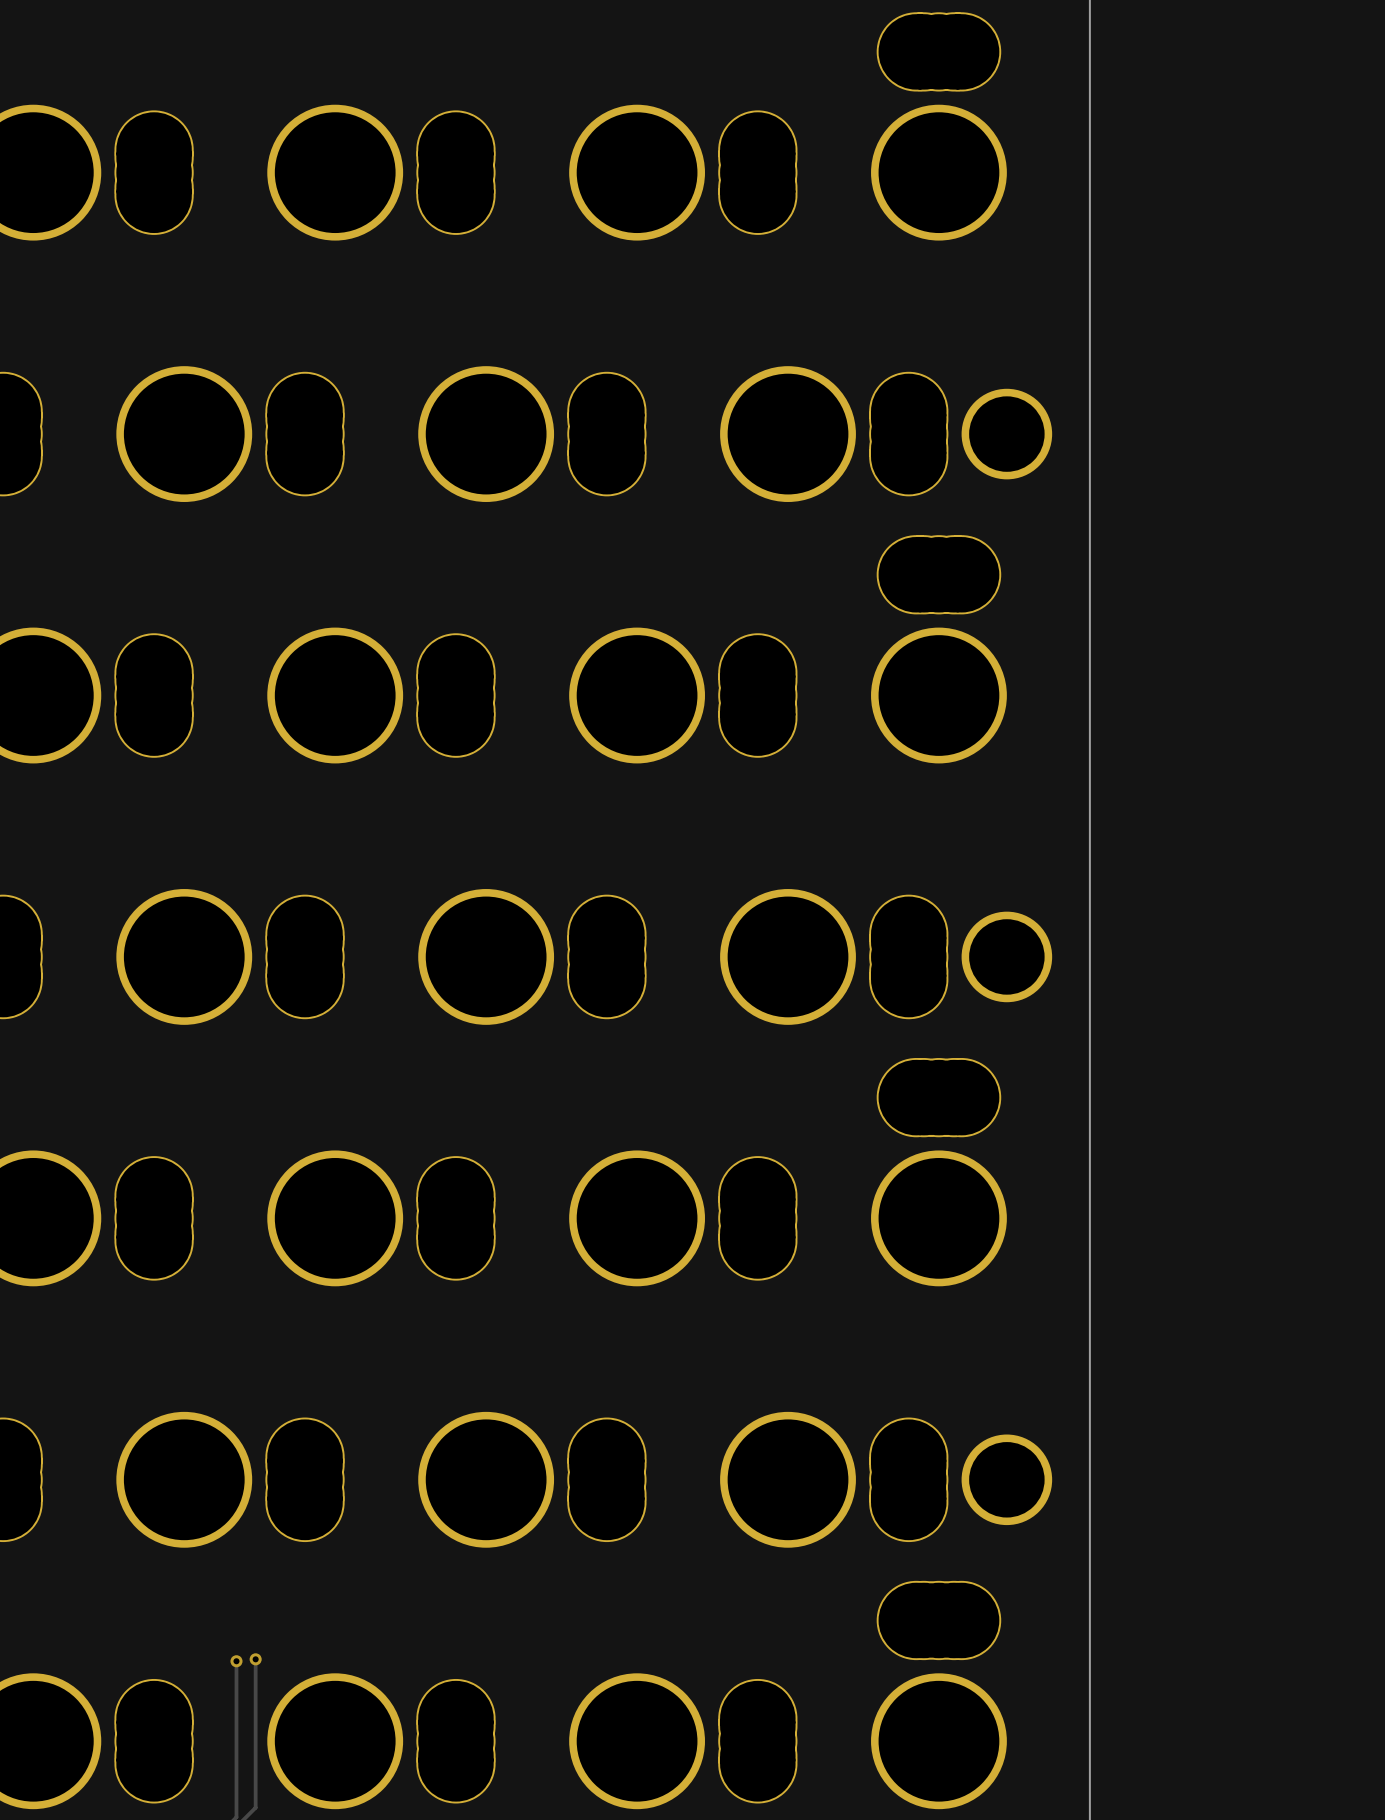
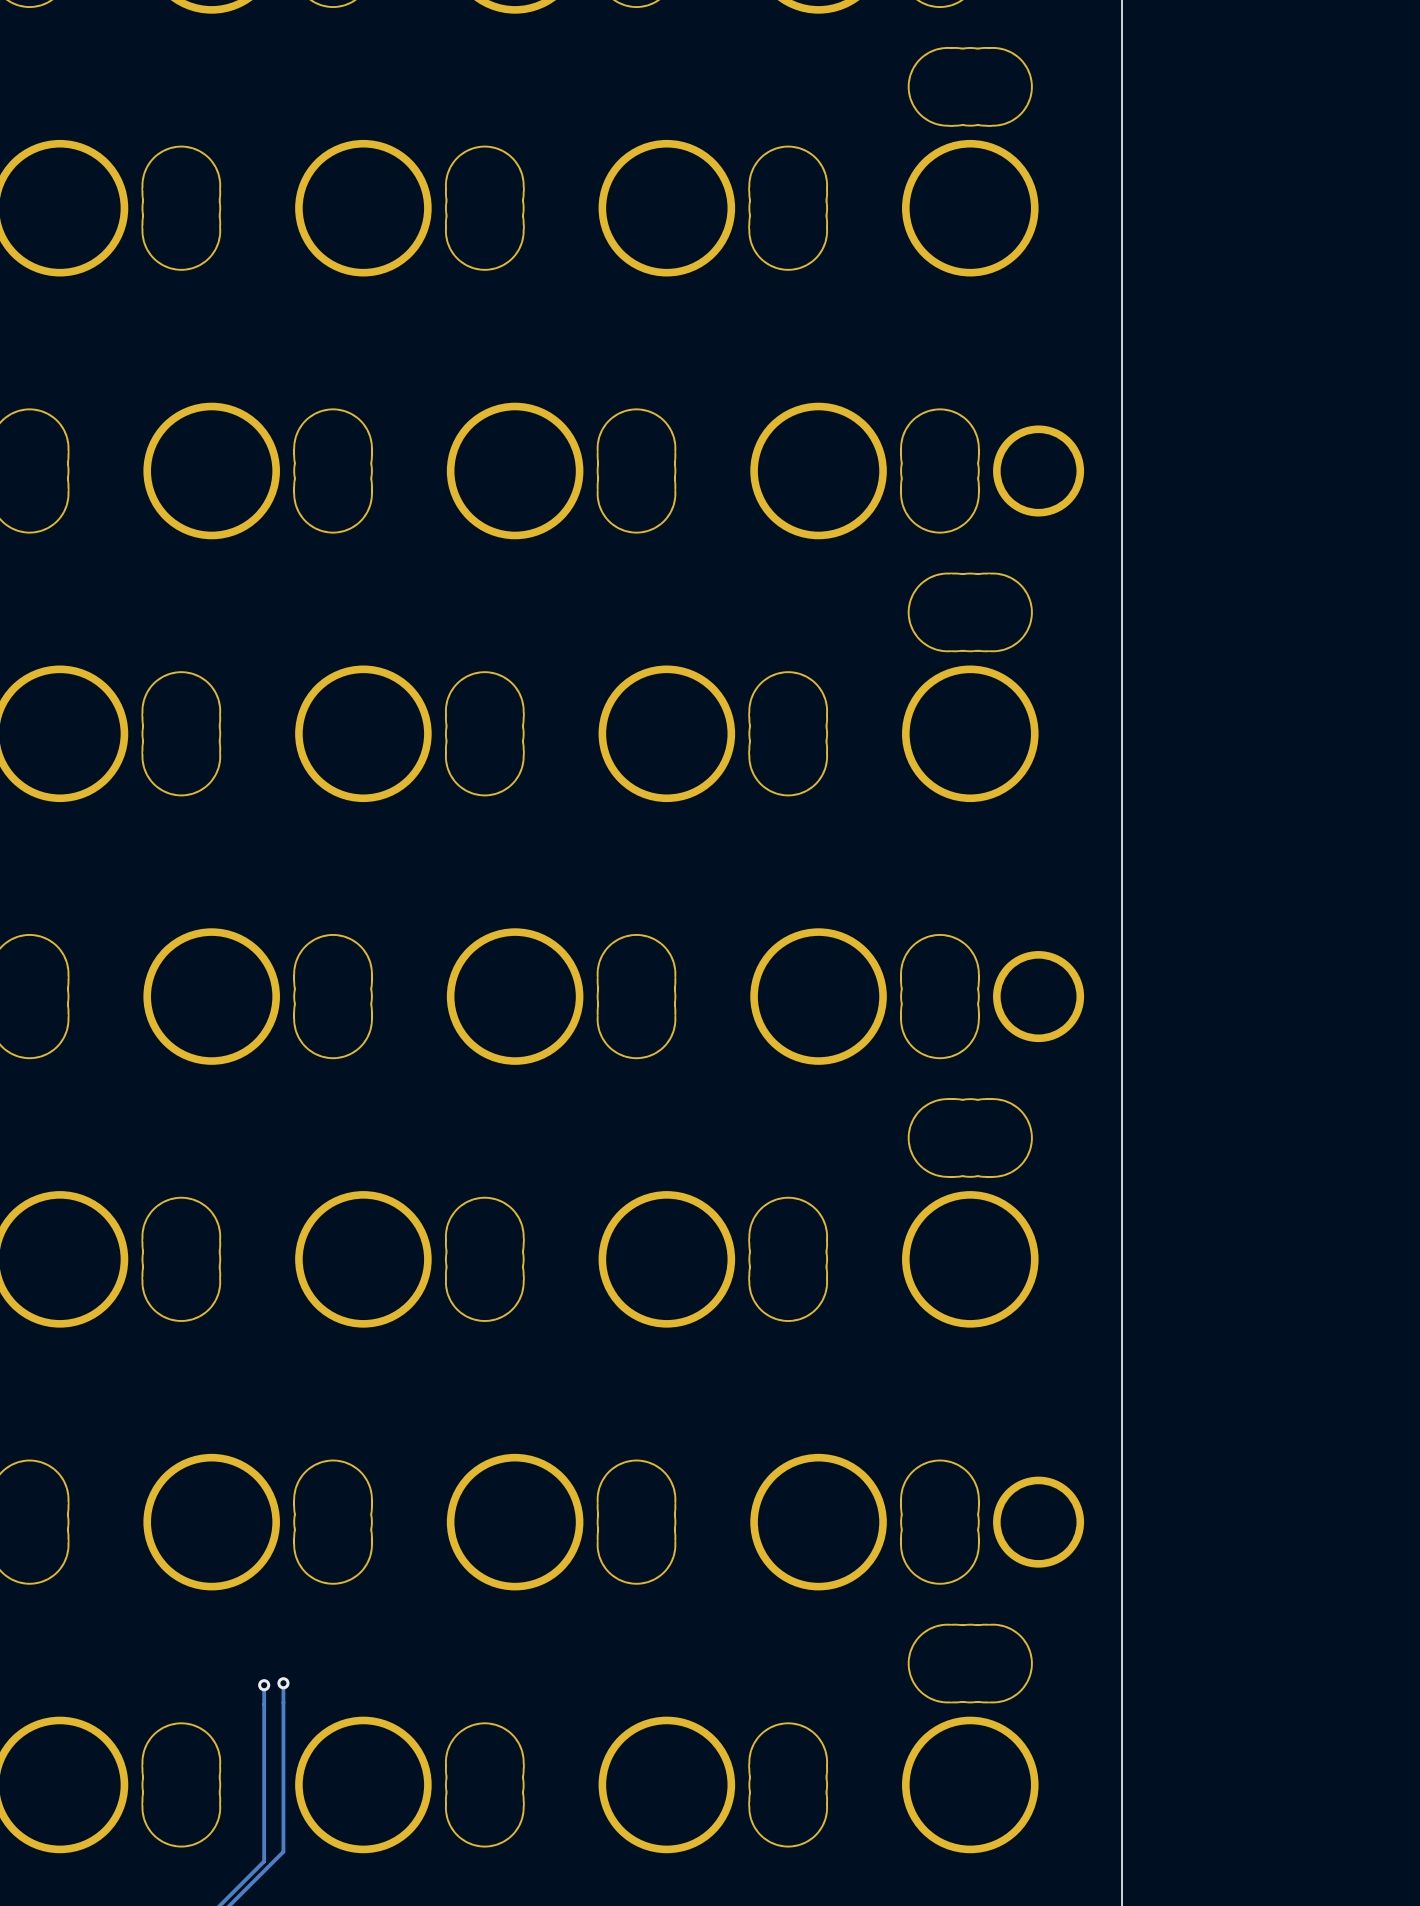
track: none -> (283, 1683) (283, 1702)
via: none -> (283, 1683)
track: none -> (264, 1685) (264, 1704)
via: none -> (264, 1685)
via: (255, 1659) -> none
via: (236, 1661) -> none

